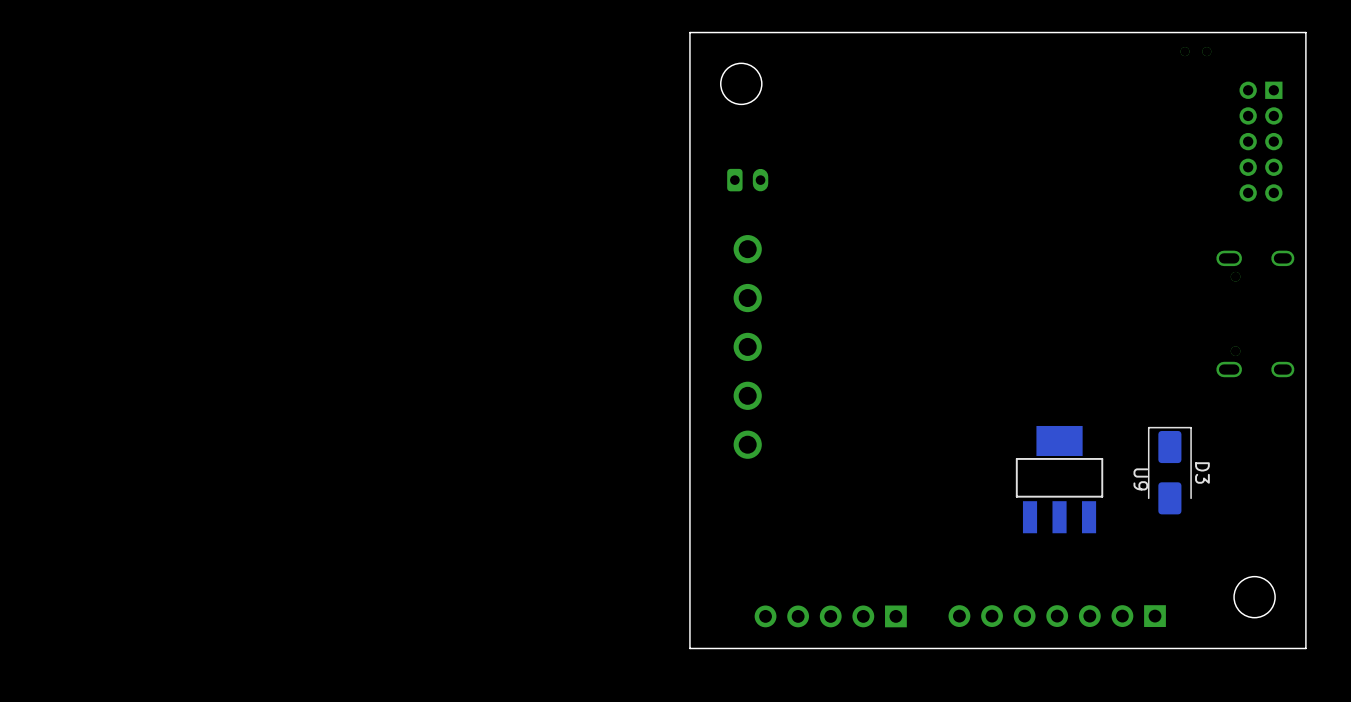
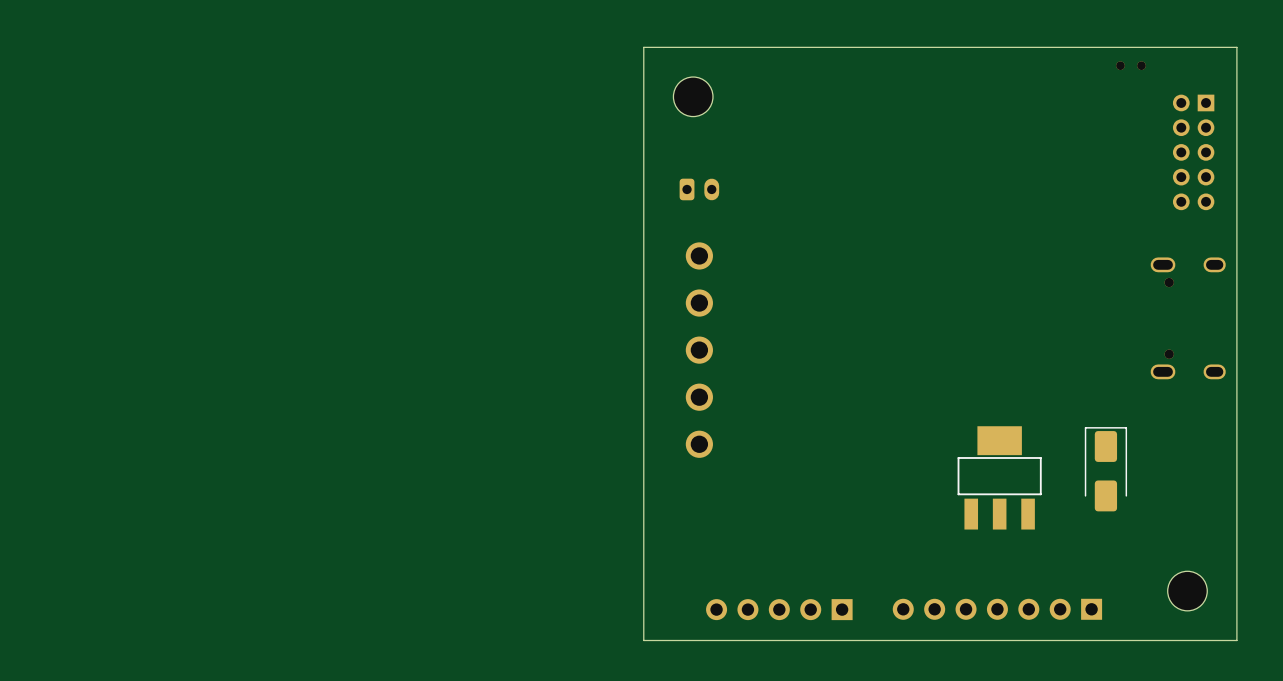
D3 name: D3 (1202, 472) -> none
U9 name: U9 (1140, 479) -> none

